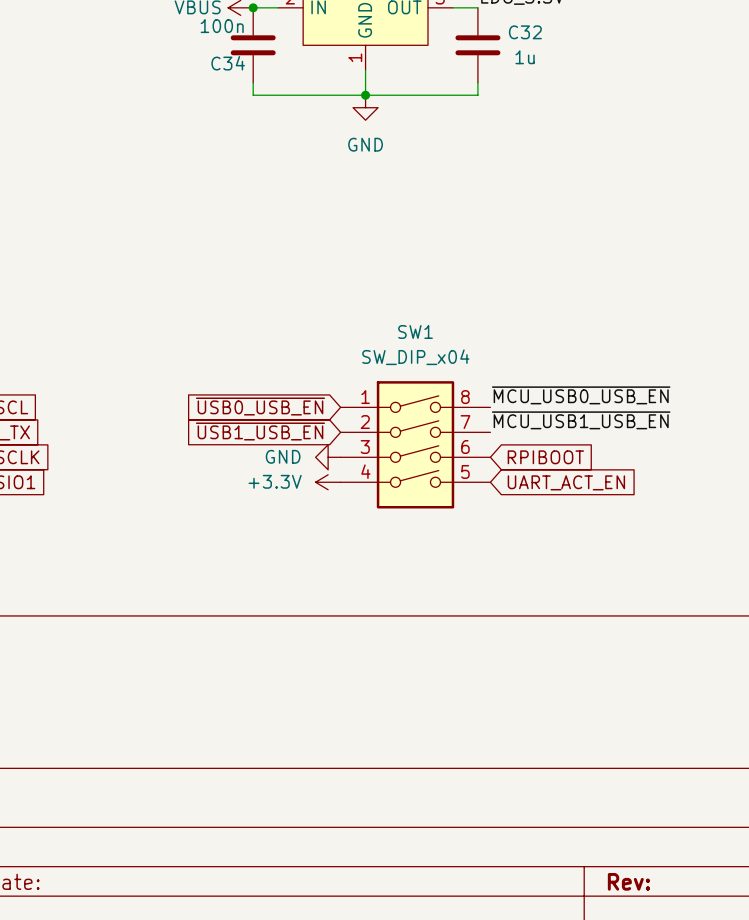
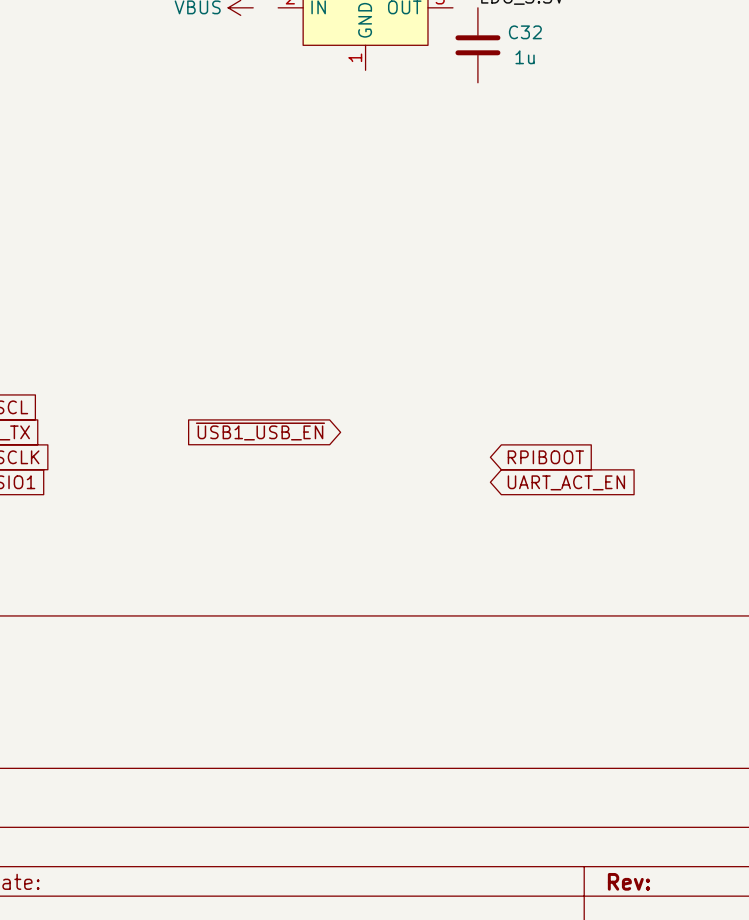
wire: (253, 7) (278, 7) -> none
junction: (253, 7) -> none
wire: (452, 7) (477, 7) -> none
C34: 100n (253, 45) -> none
wire: (365, 70) (365, 95) -> none
wire: (253, 82) (253, 95) (477, 95) (477, 82) -> none
junction: (365, 95) -> none
power symbol: GND (365, 107) -> none
label: ~{MCU_USB0_USB_EN} (581, 395) -> none
global label: ~{USB0_USB_EN} (260, 406) -> none
label: ~{MCU_USB1_USB_EN} (581, 420) -> none
SW1: SW_DIP_x04 (415, 444) -> none
power symbol: GND (328, 457) -> none
power symbol: +3.3V (328, 482) -> none

